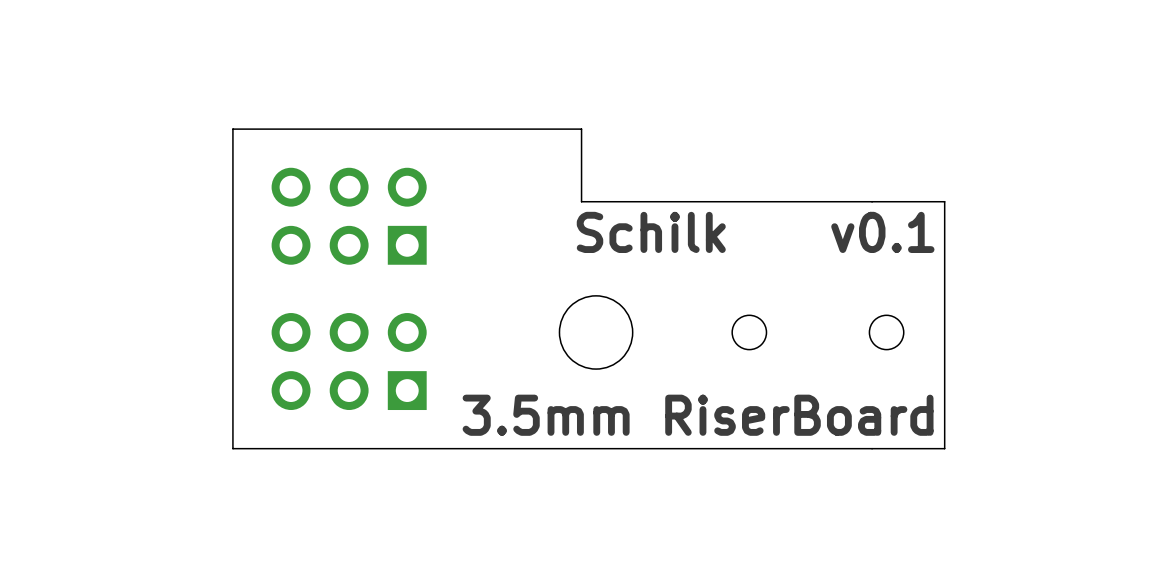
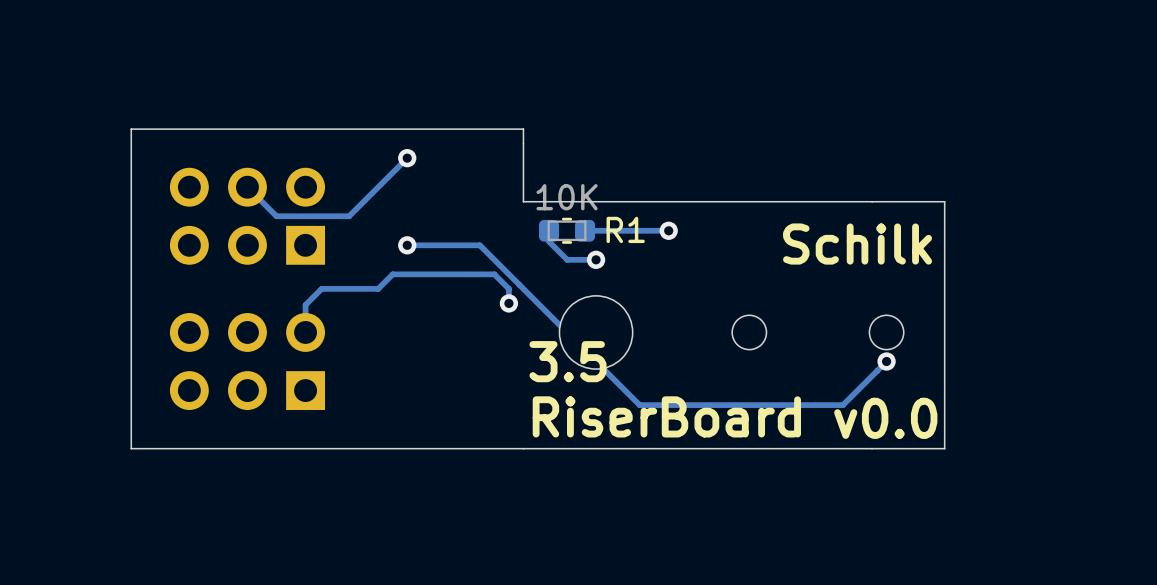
board edge: (232, 129) (232, 448) -> (232, 129) (131, 129) (131, 448) (232, 448)
board edge: (523, 129) (581, 129) (581, 201) -> (523, 129) (523, 201) (581, 201)
track: none -> (407, 158) (349, 216) (276, 216) (247, 187)
via: none -> (407, 158)
part: none -> (247, 216)
part: (349, 216) -> none
track: none -> (549, 230) (549, 241) (567, 259) (596, 259)
R1: none -> 10K (567, 230)
track: none -> (668, 230) (585, 230)
via: none -> (668, 230)
text position: Schilk (651, 232) -> Schilk (857, 244)
text: v0.1 (882, 232) -> none
track: none -> (407, 245) (479, 245) (639, 405) (843, 405) (886, 361)
via: none -> (407, 245)
via: none -> (596, 259)
track: none -> (508, 303) (508, 288) (494, 274) (392, 274) (378, 288) (321, 288) (305, 304) (305, 332)
via: none -> (508, 303)
part: none -> (247, 361)
part: (349, 361) -> none
text: none -> 3.5 (567, 361)
via: none -> (886, 361)
text: 3.5mm RiserBoard (698, 415) -> RiserBoard (666, 416)
text: none -> v0.0 (885, 418)

